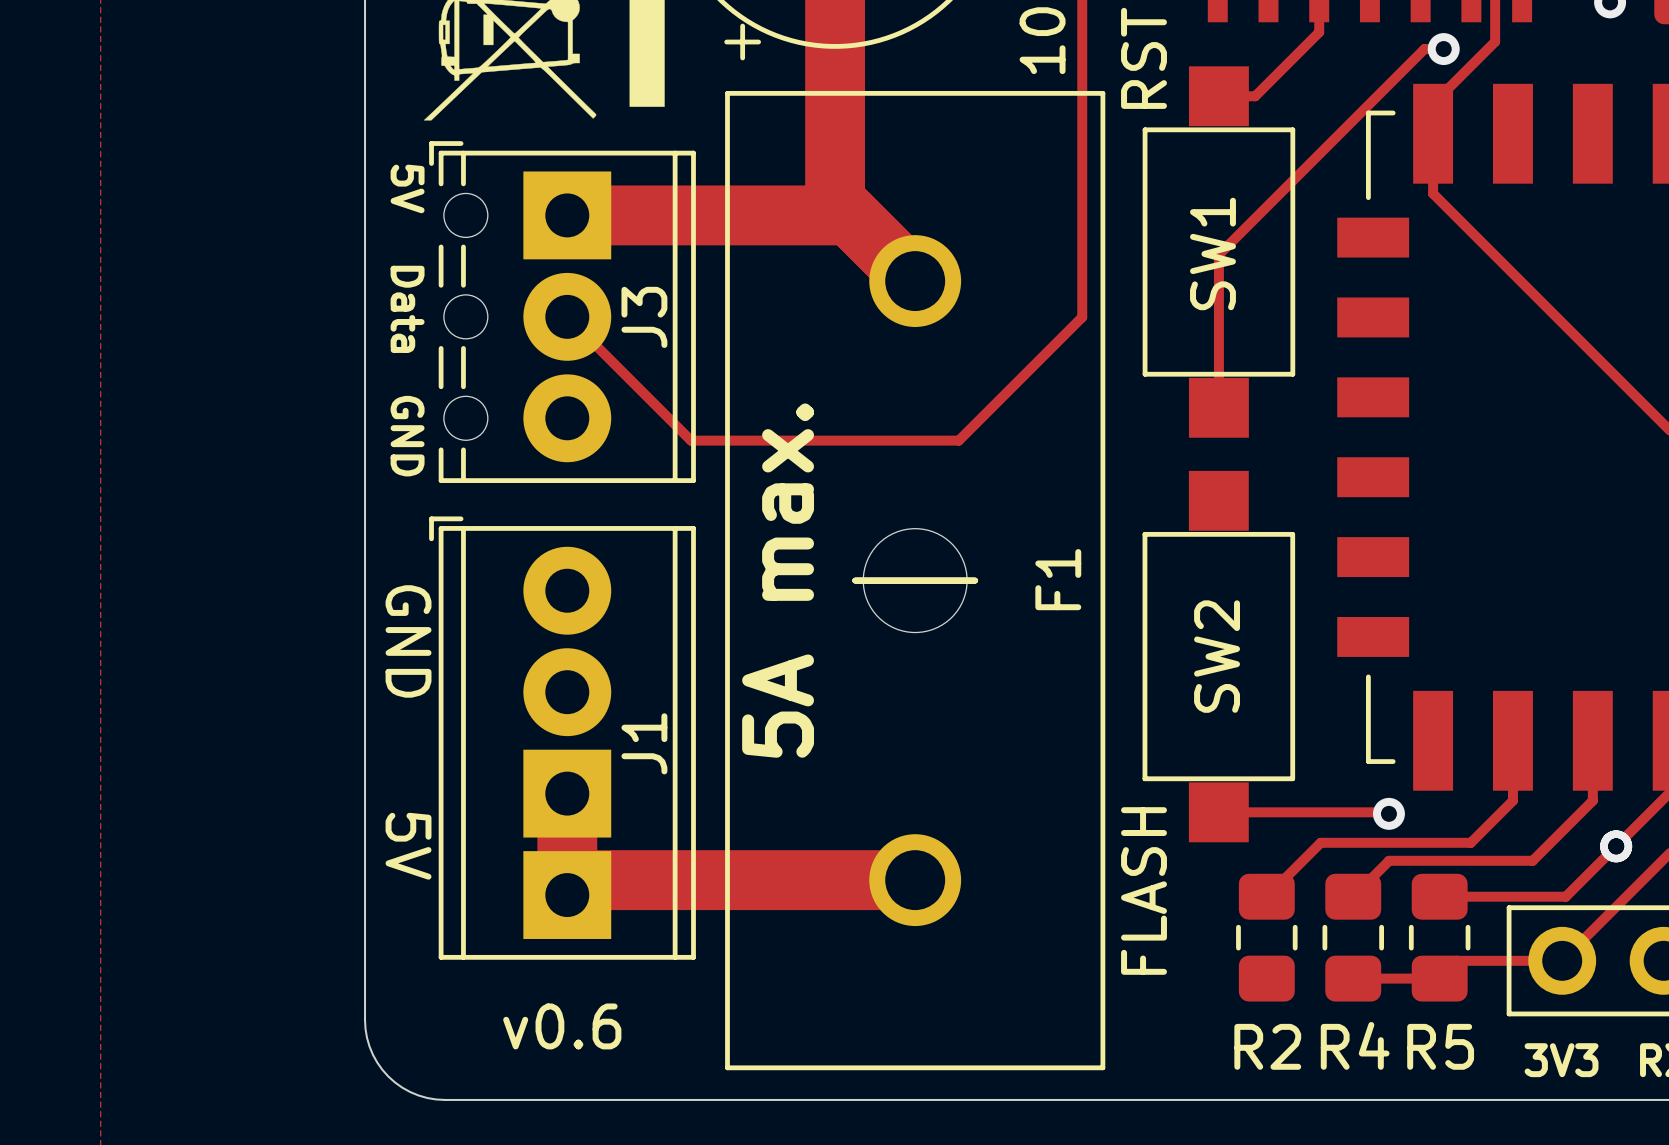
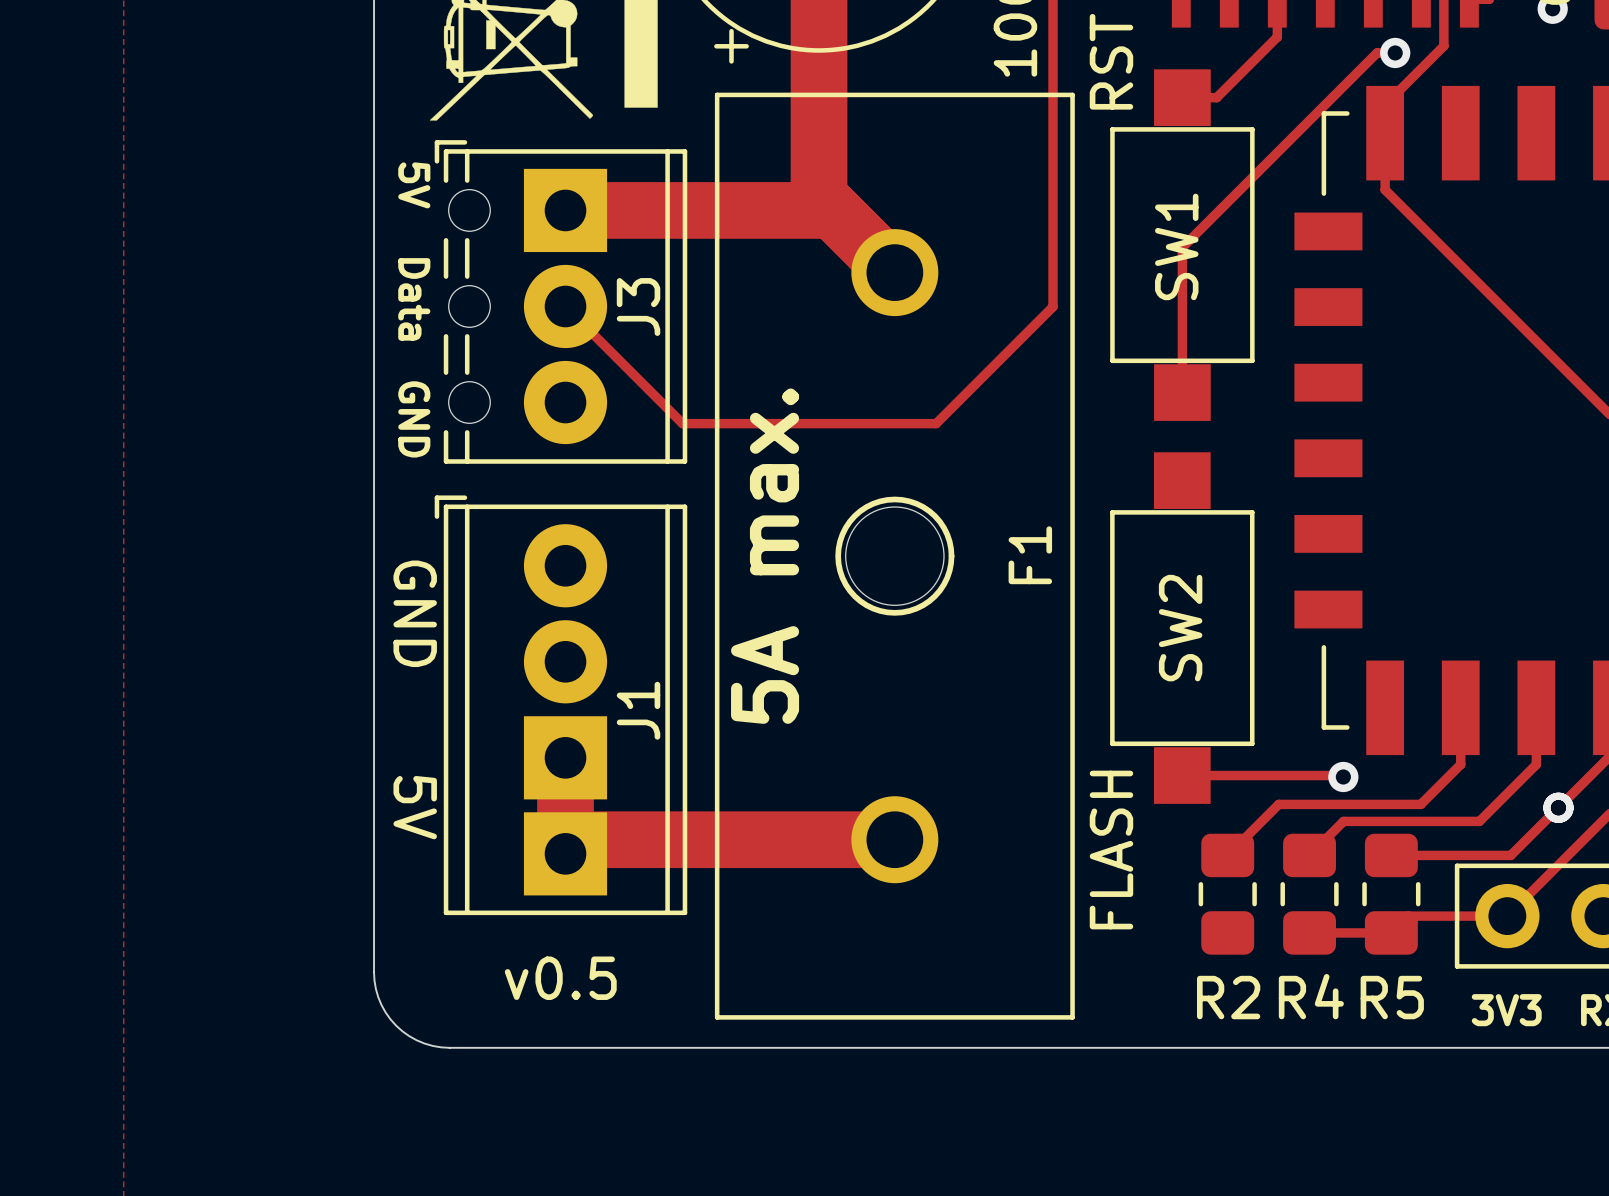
F1 footprint: [725, 90, 1106, 1071] -> [714, 92, 1075, 1020]
text: v0.6 (562, 1026) -> v0.5 (560, 978)

